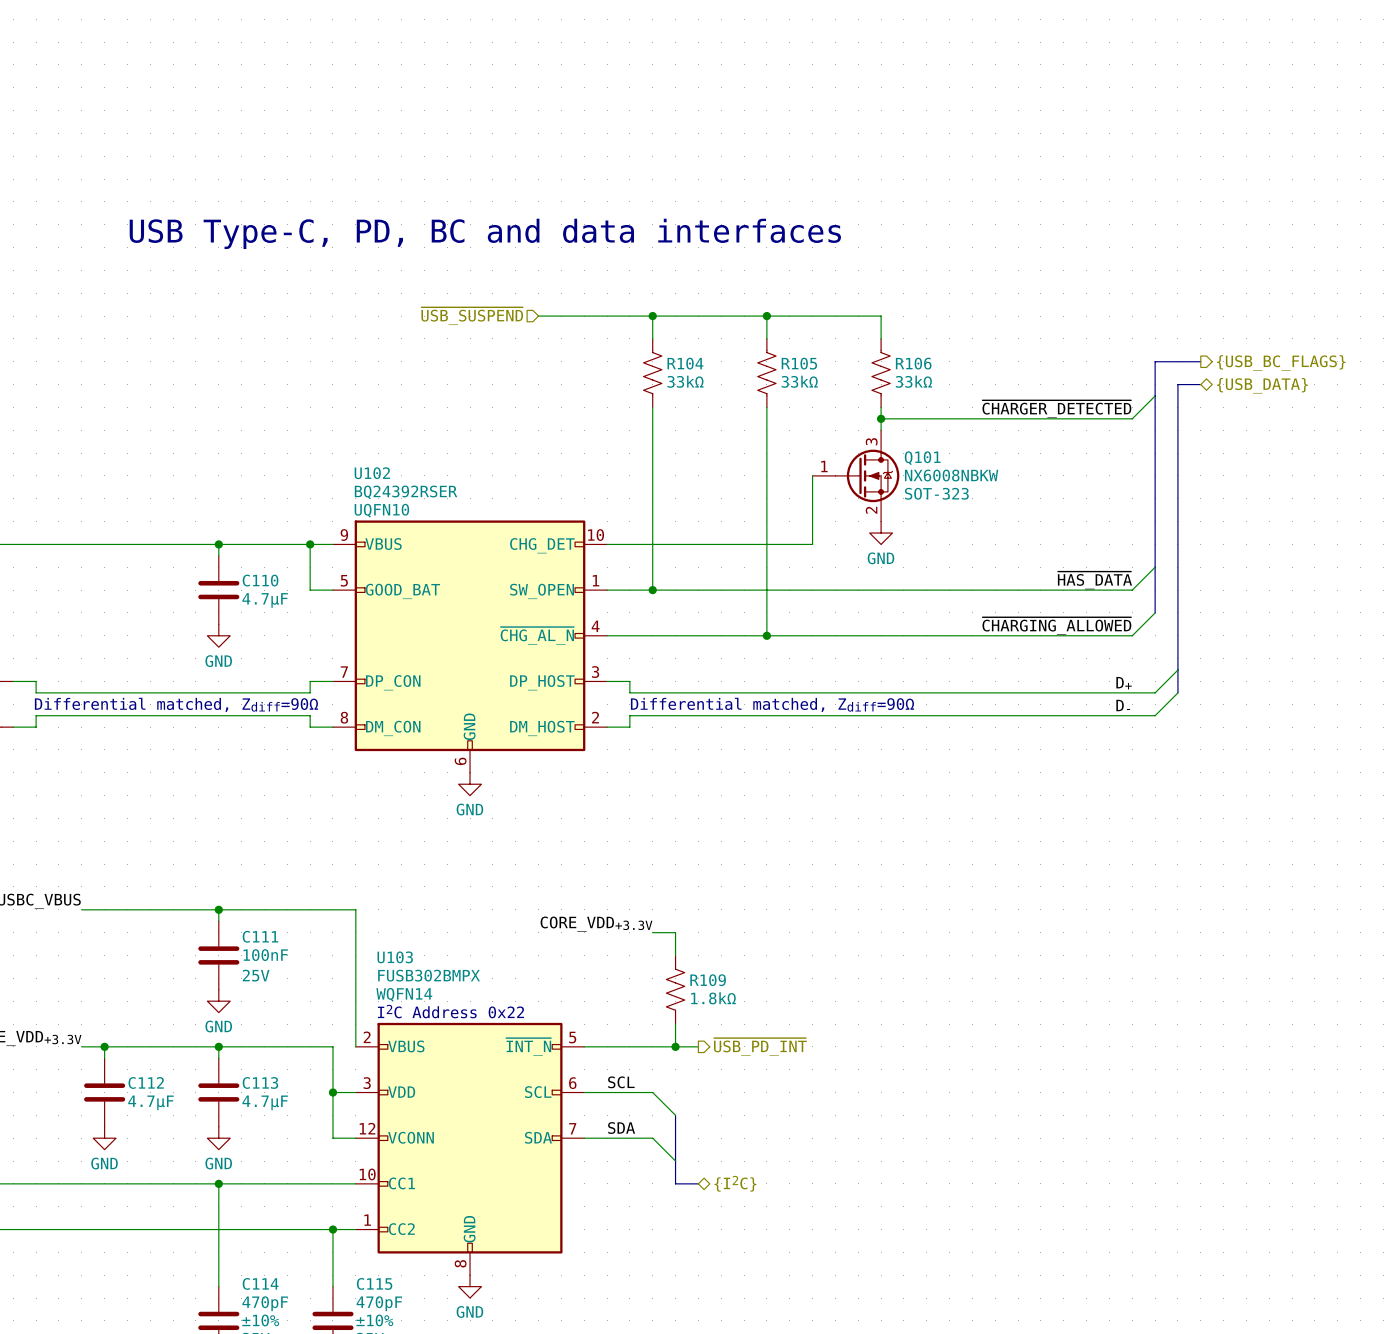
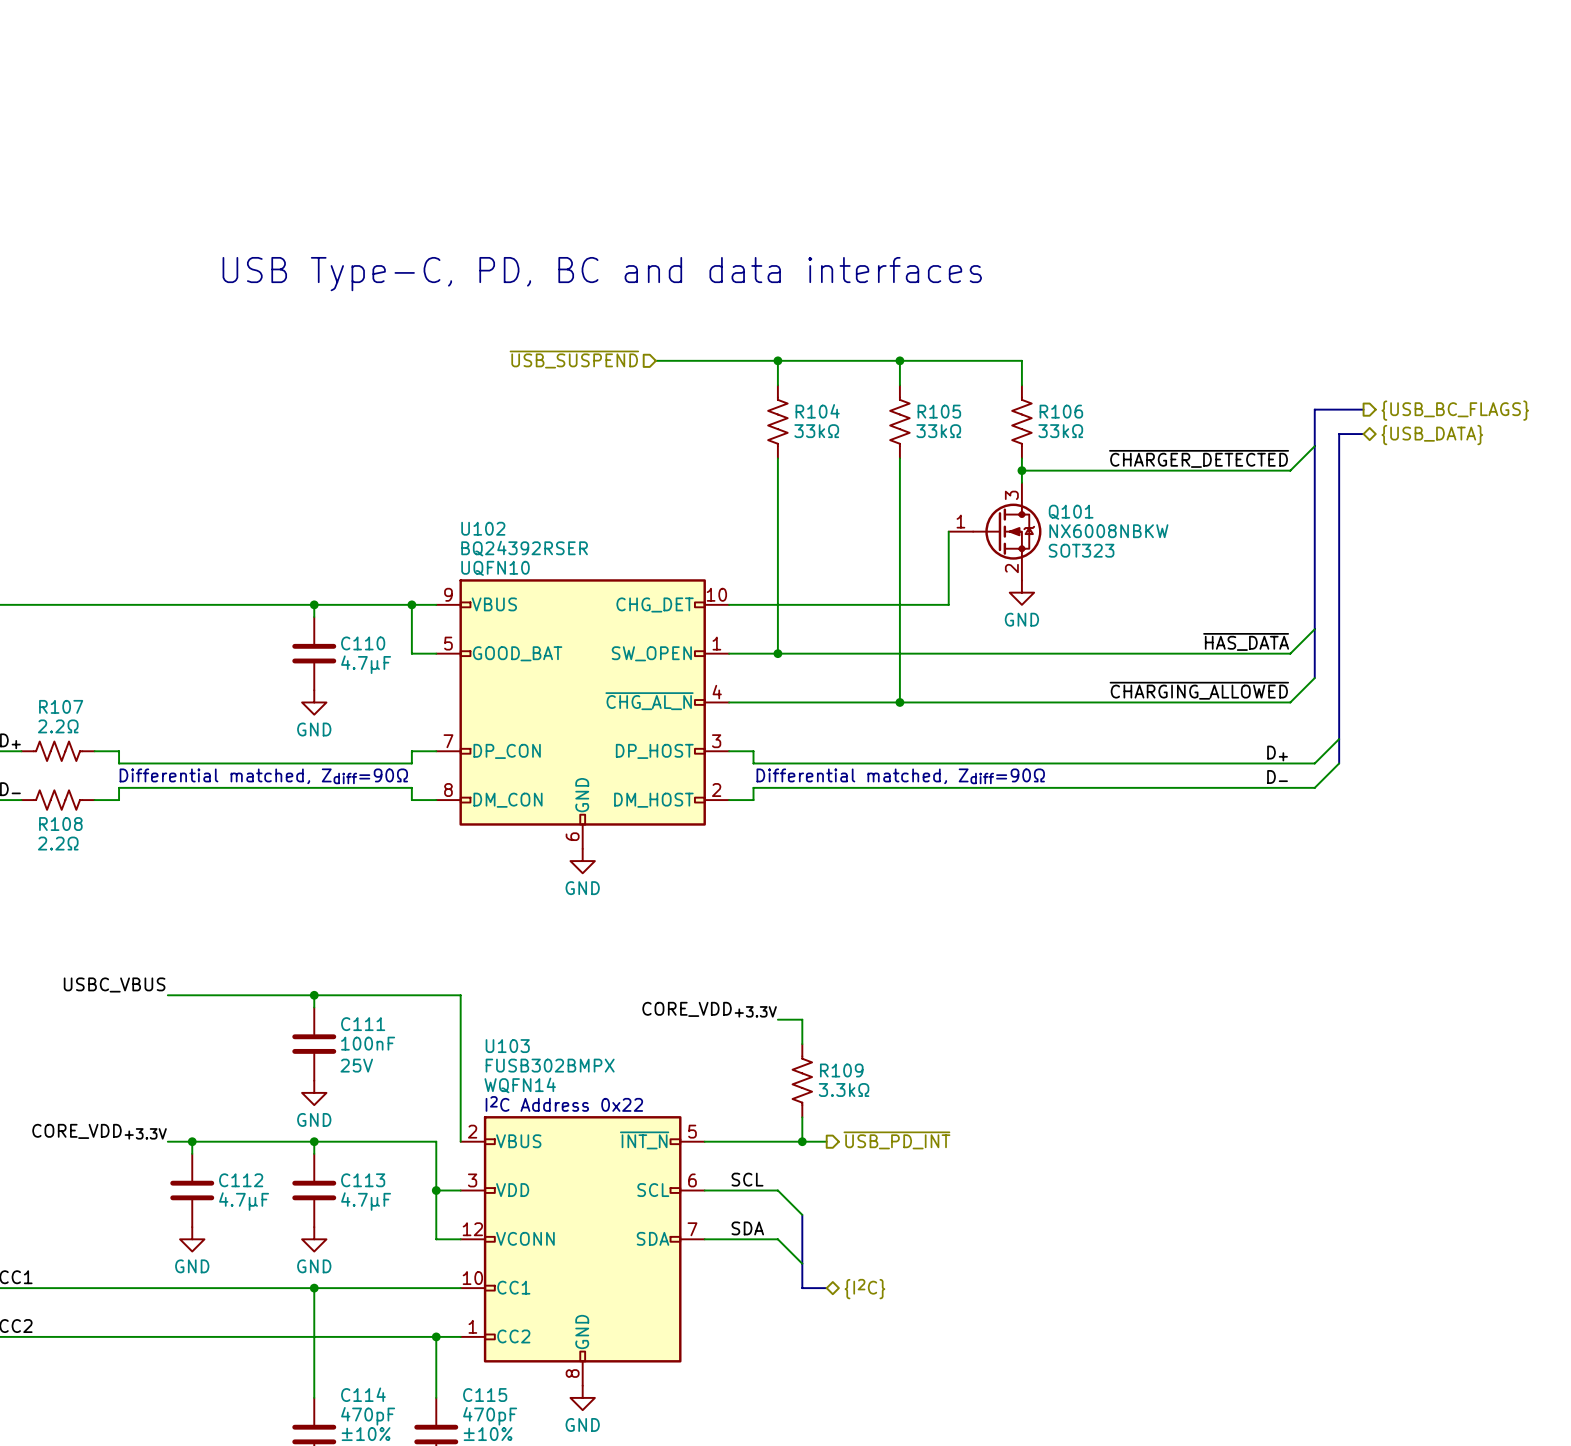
Q101 text: SOT-323 (936, 493) -> SOT323 (1081, 550)
R109 value: 1.8kΩ (713, 998) -> 3.3kΩ (844, 1090)

